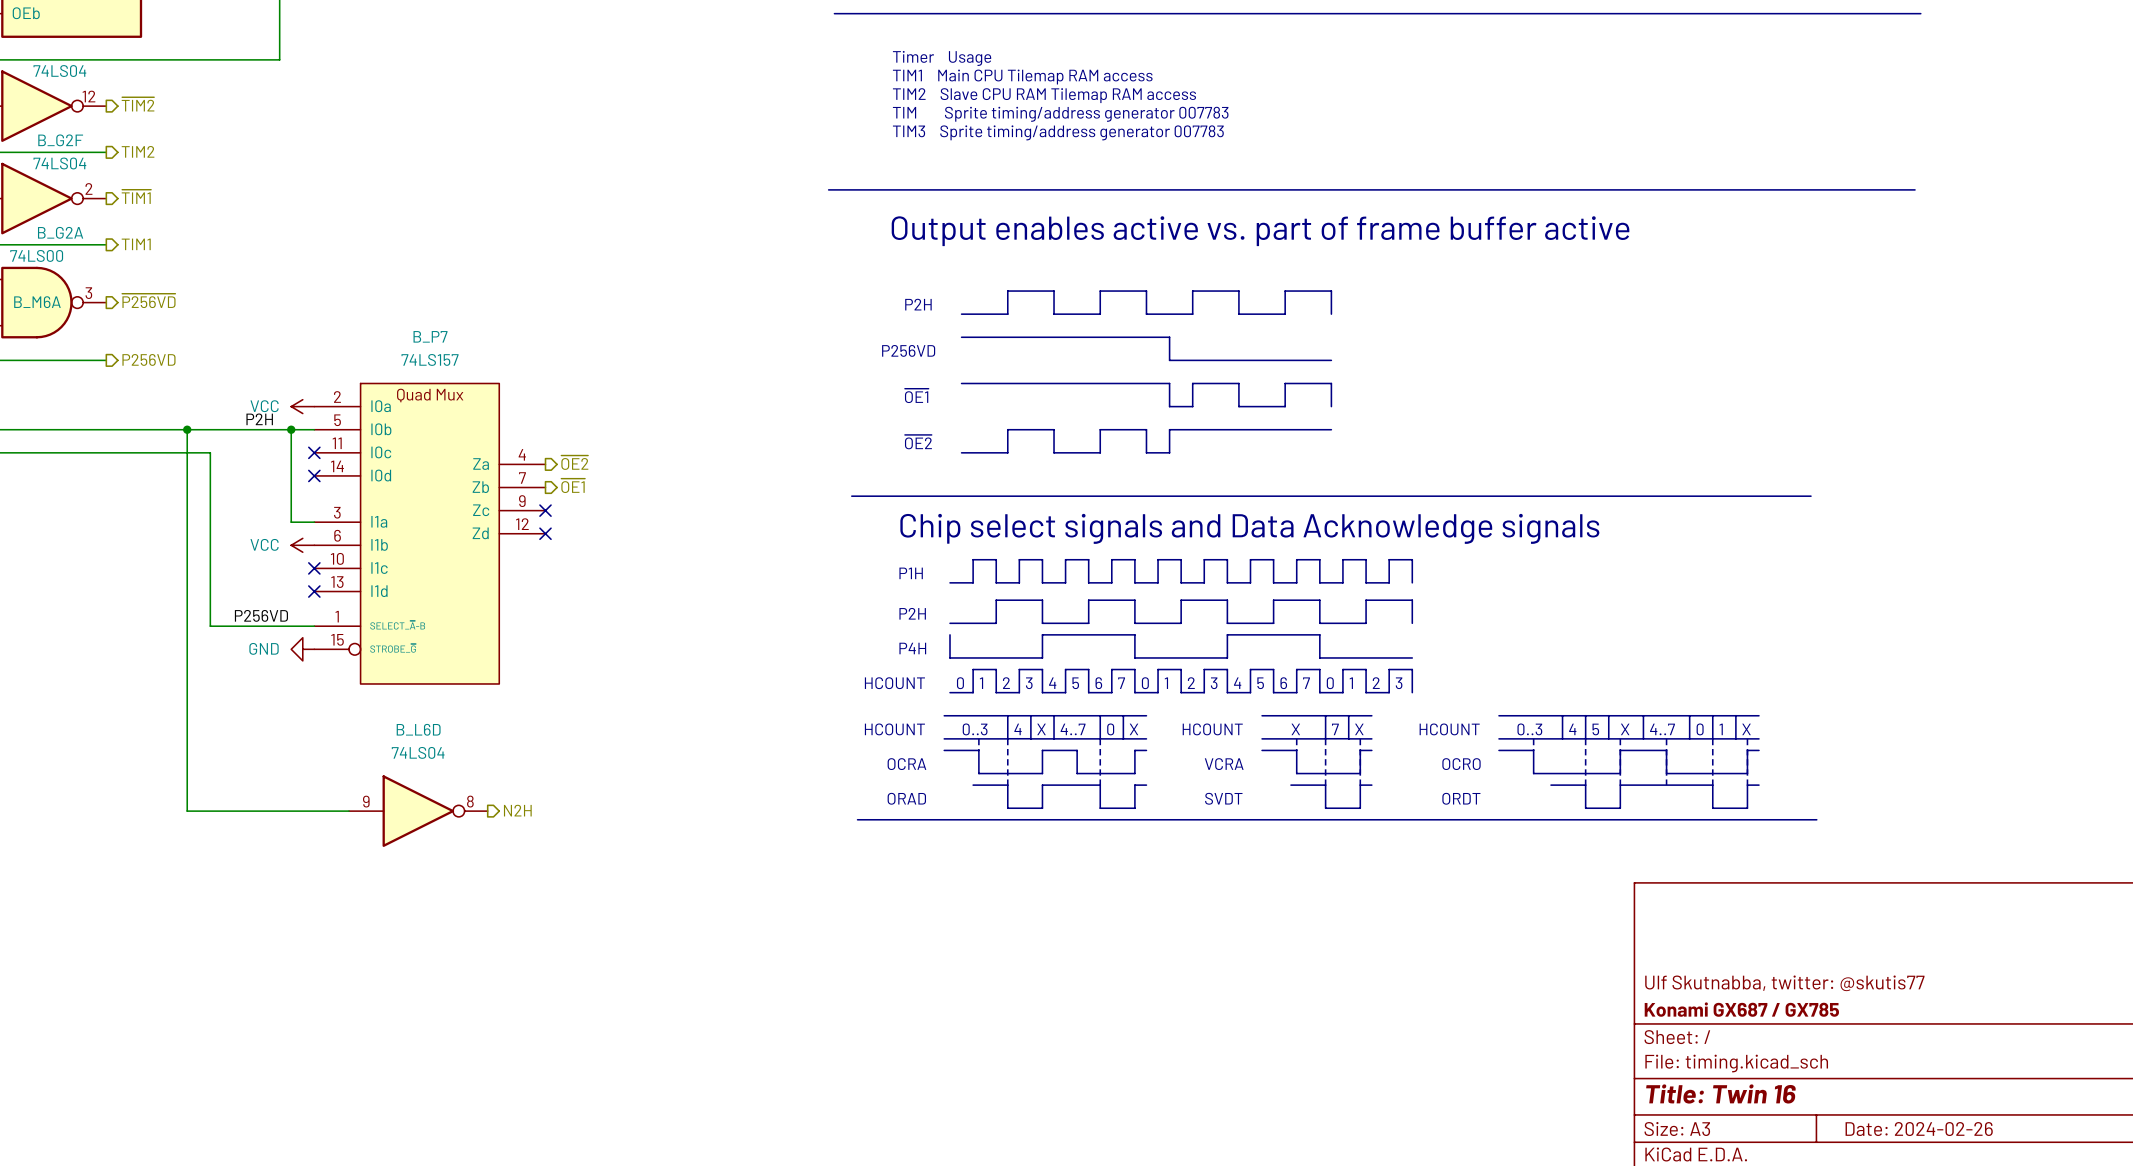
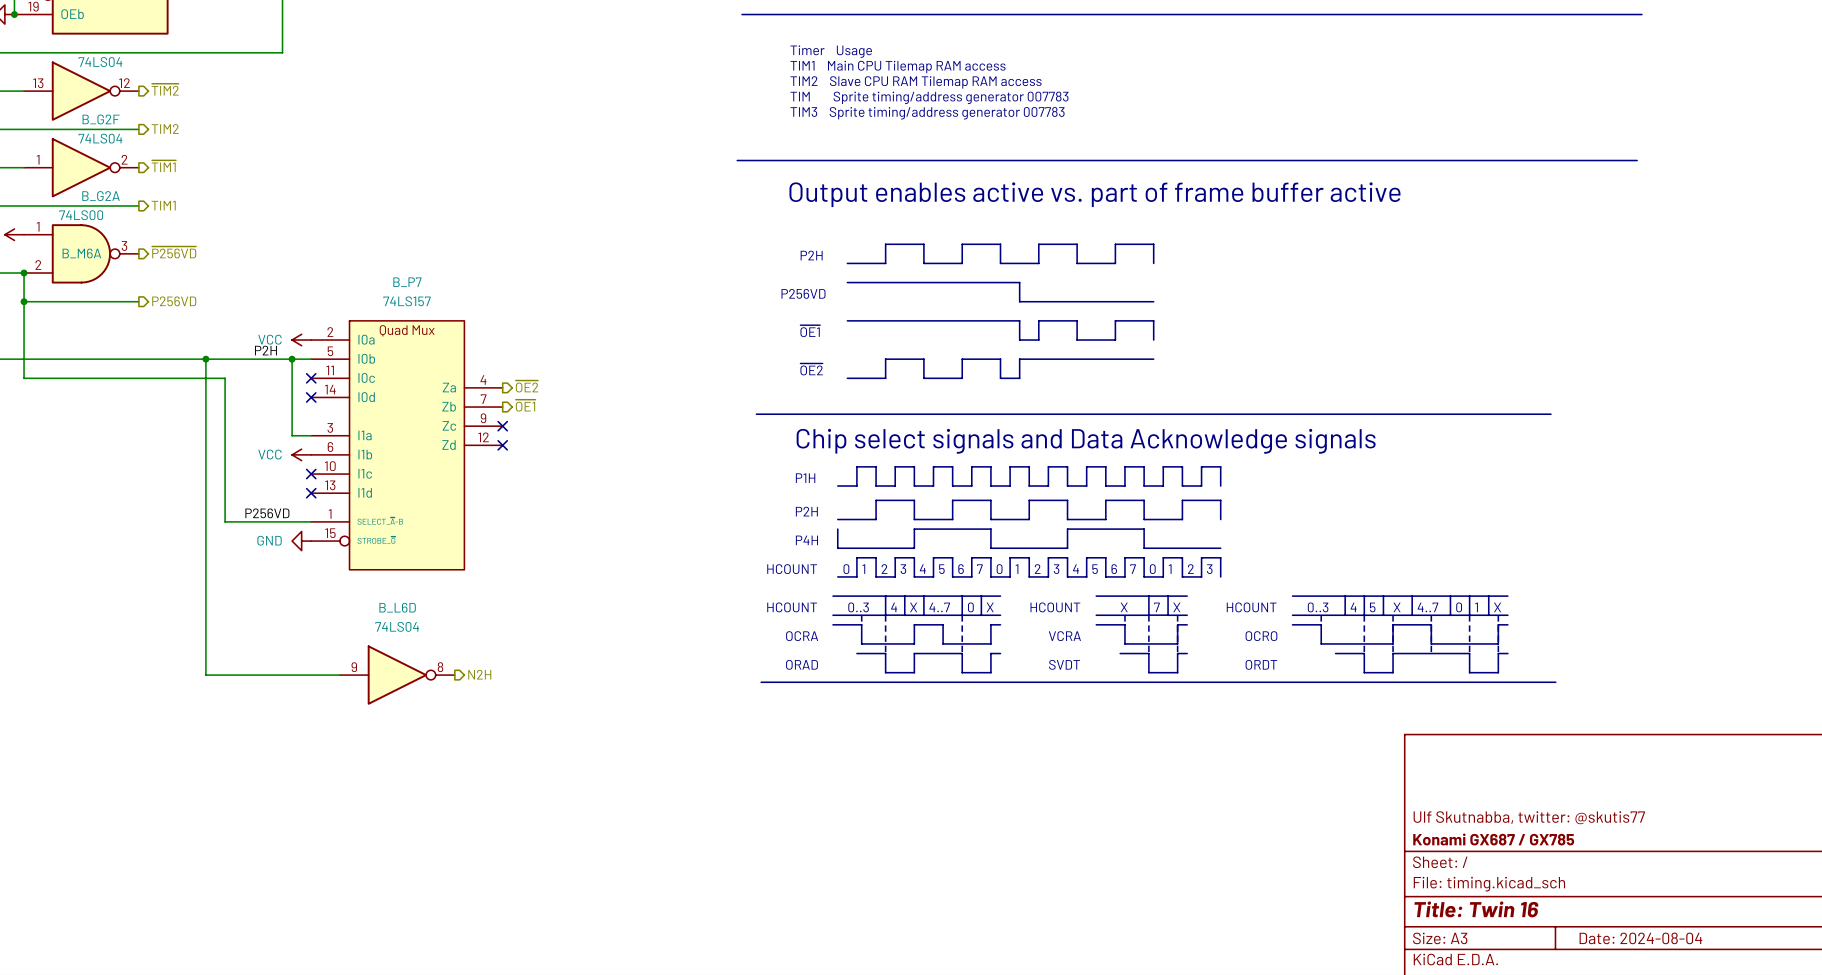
title block: Date: 2024-02-26 (1919, 1129) -> Date: 2024-08-04 (1640, 938)

